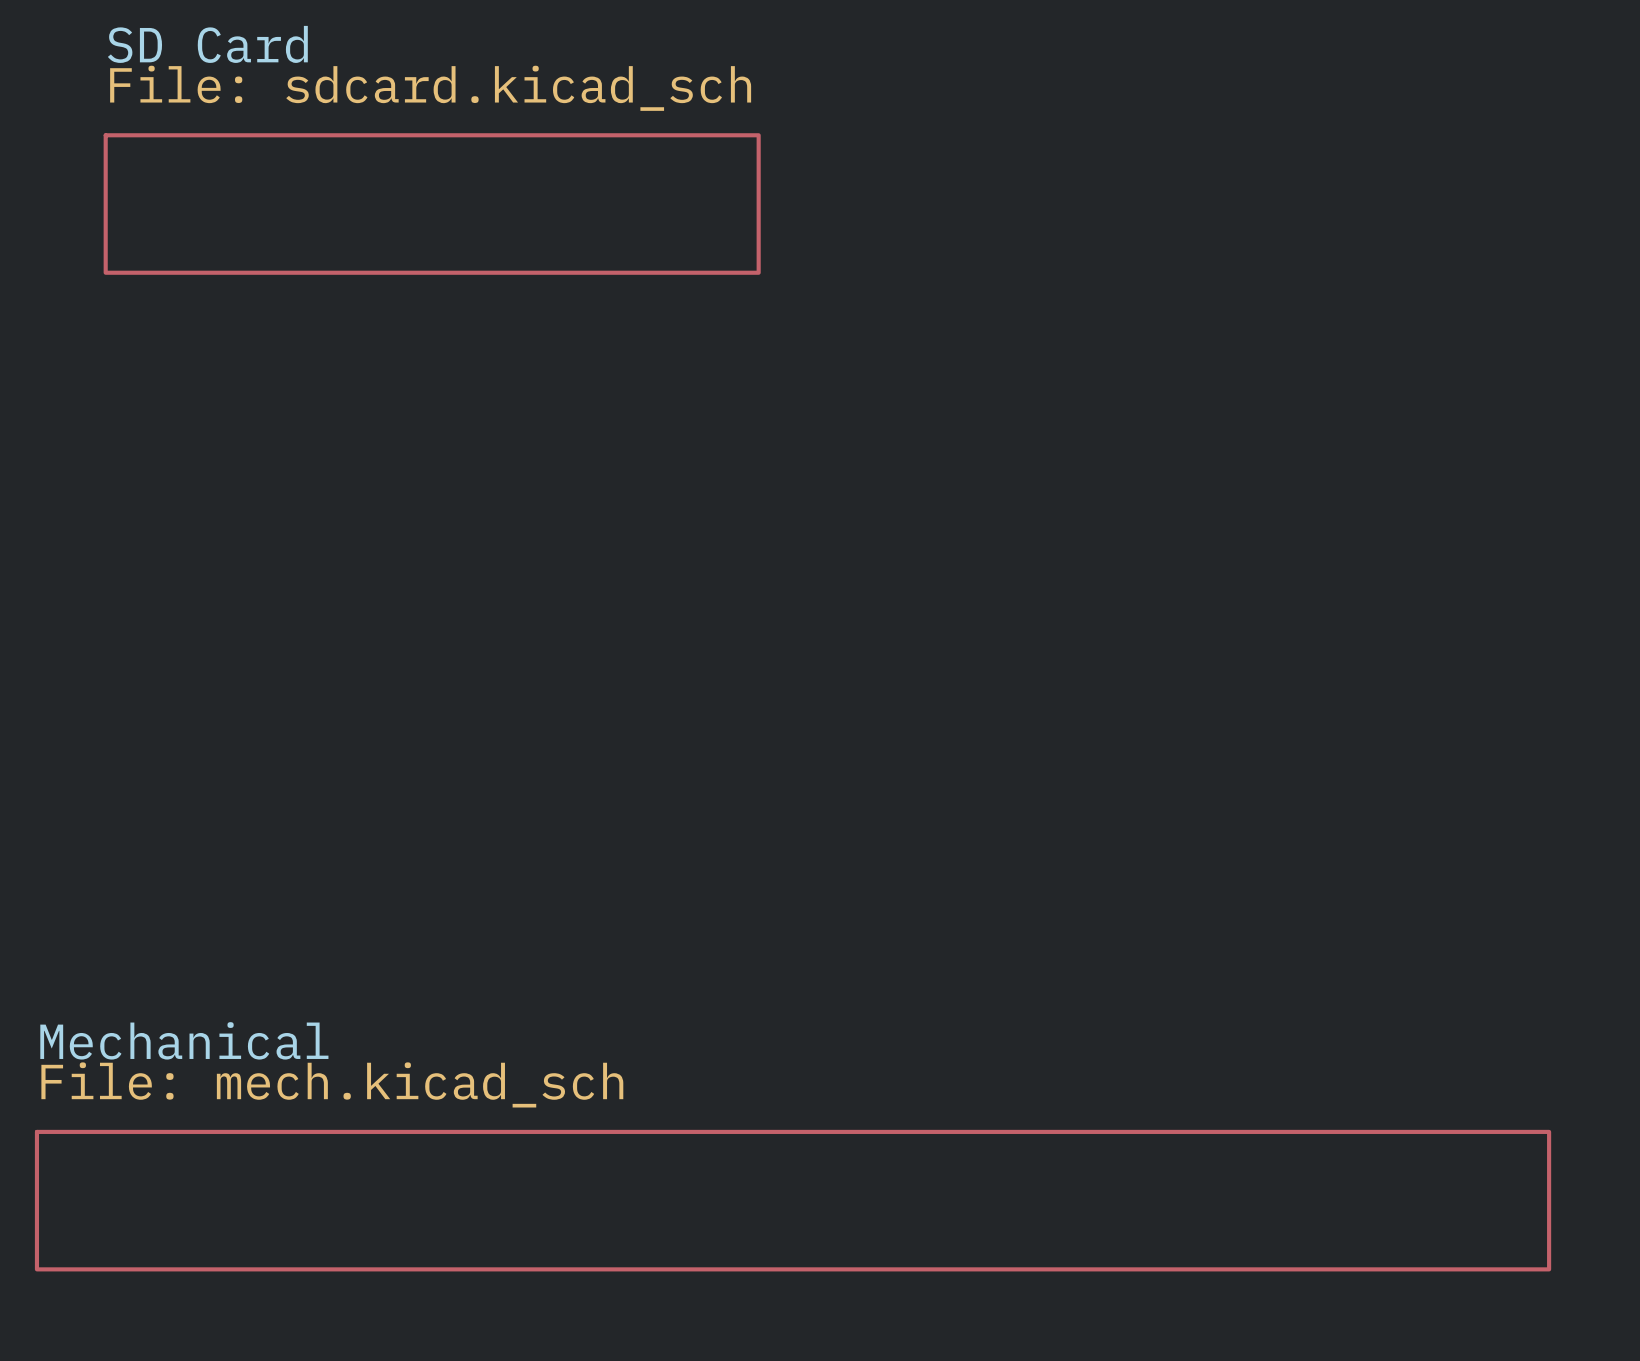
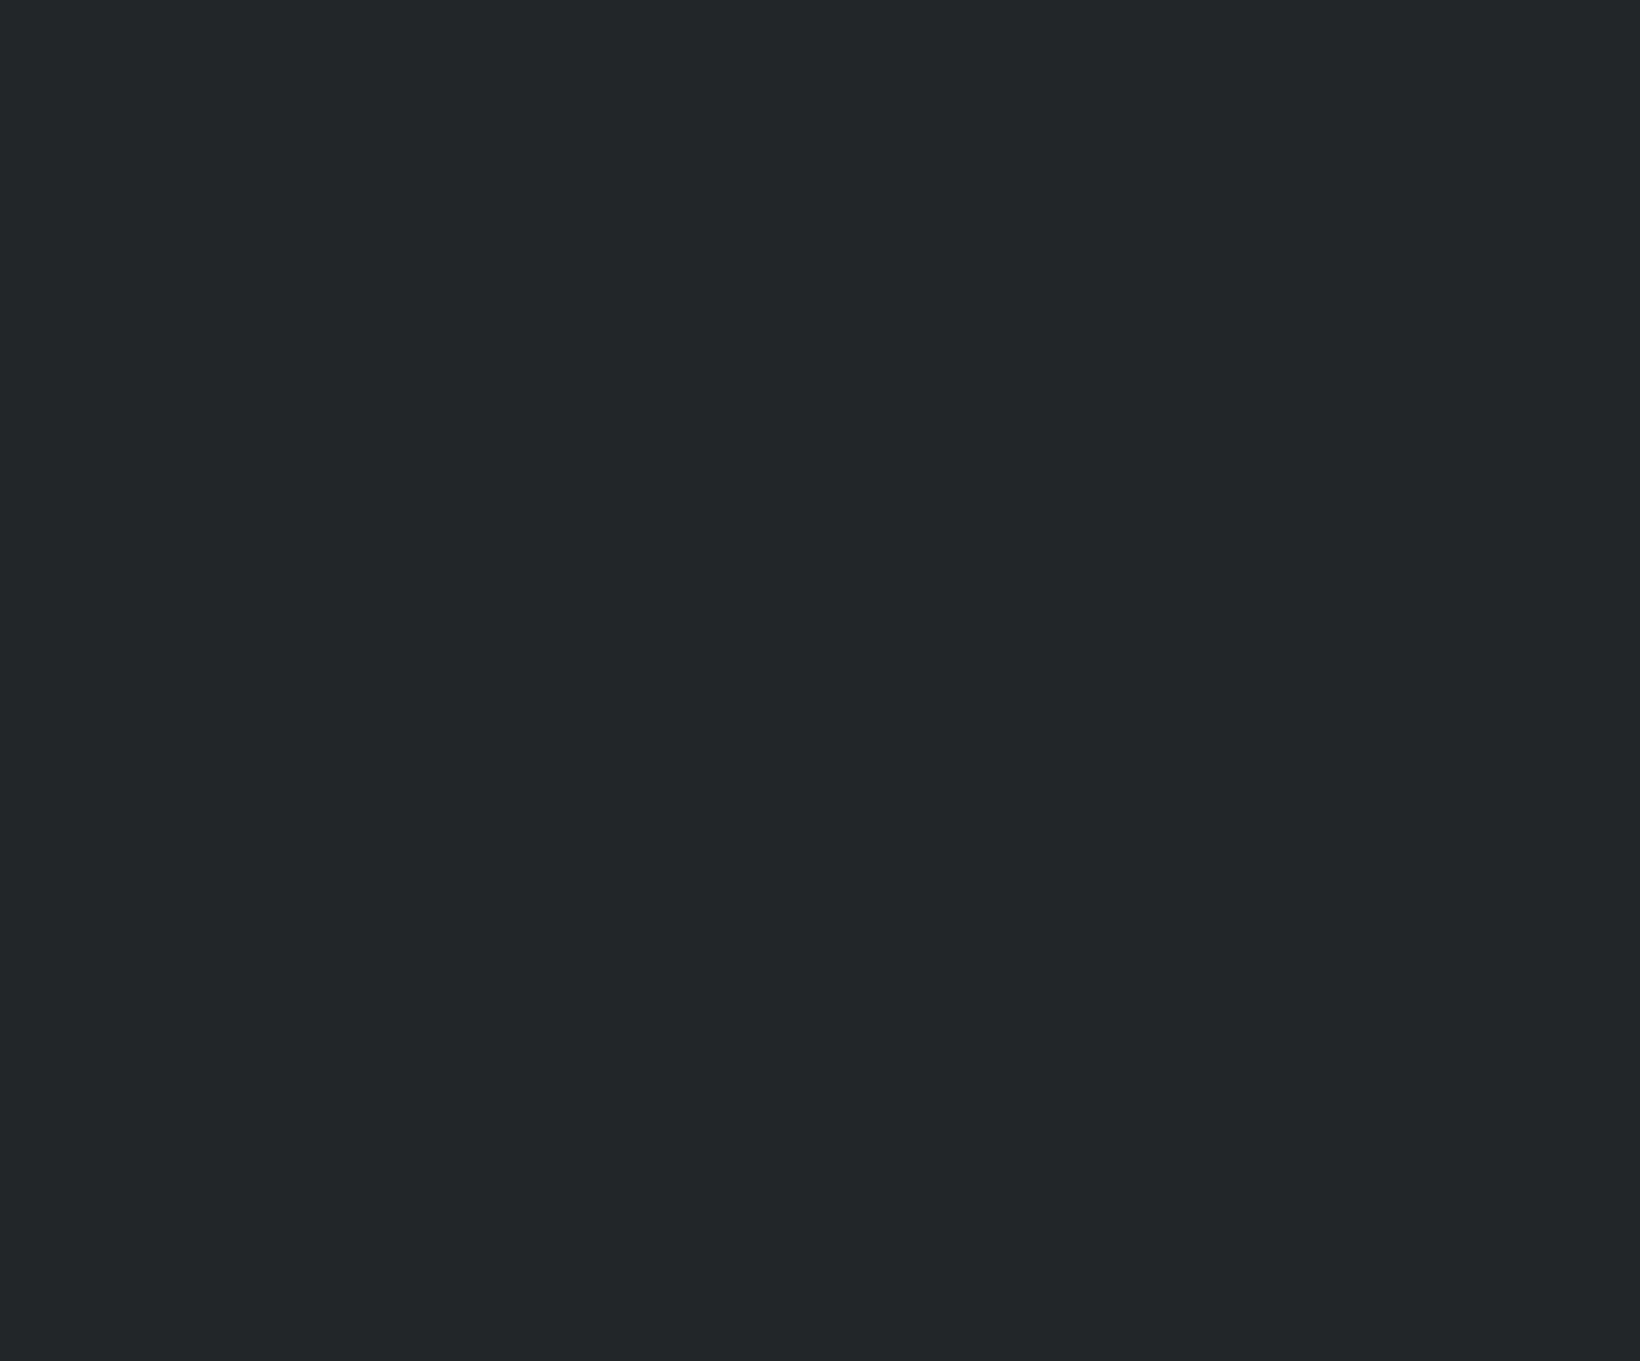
sheet SD Card: File: sdcard.kicad_sch (432, 204) -> none
sheet Mechanical: File: mech.kicad_sch (793, 1200) -> none

